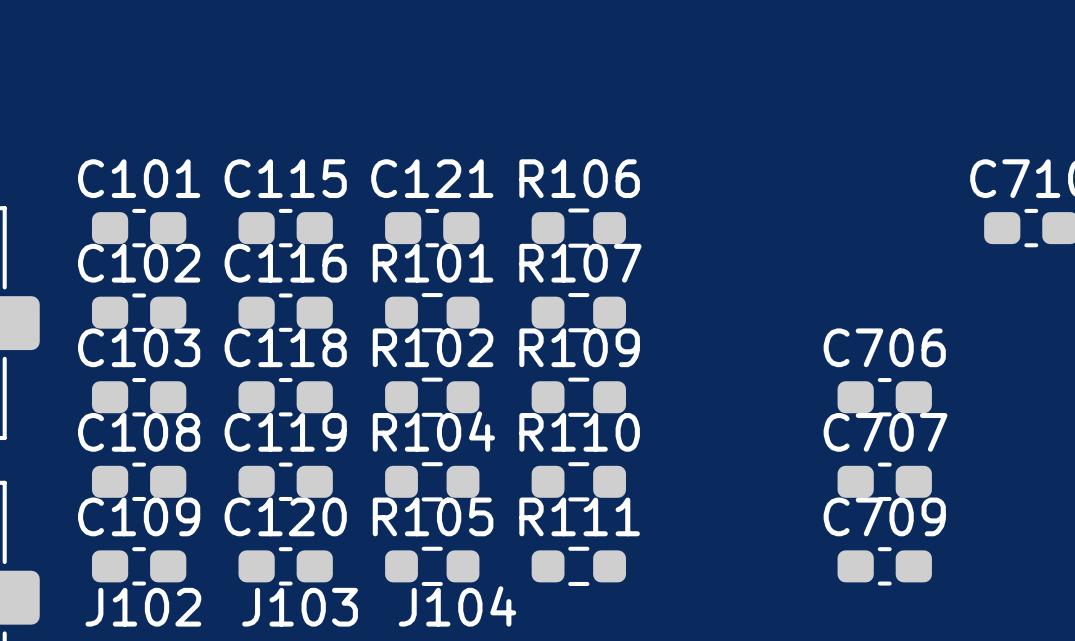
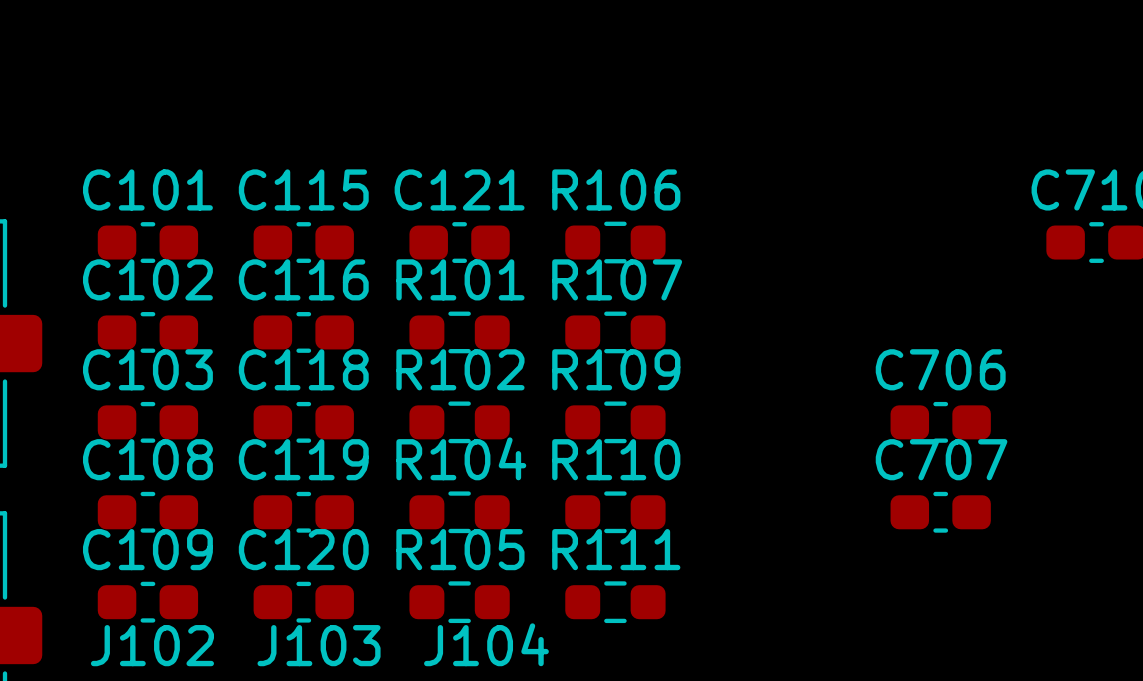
C709: (884, 566) -> none

